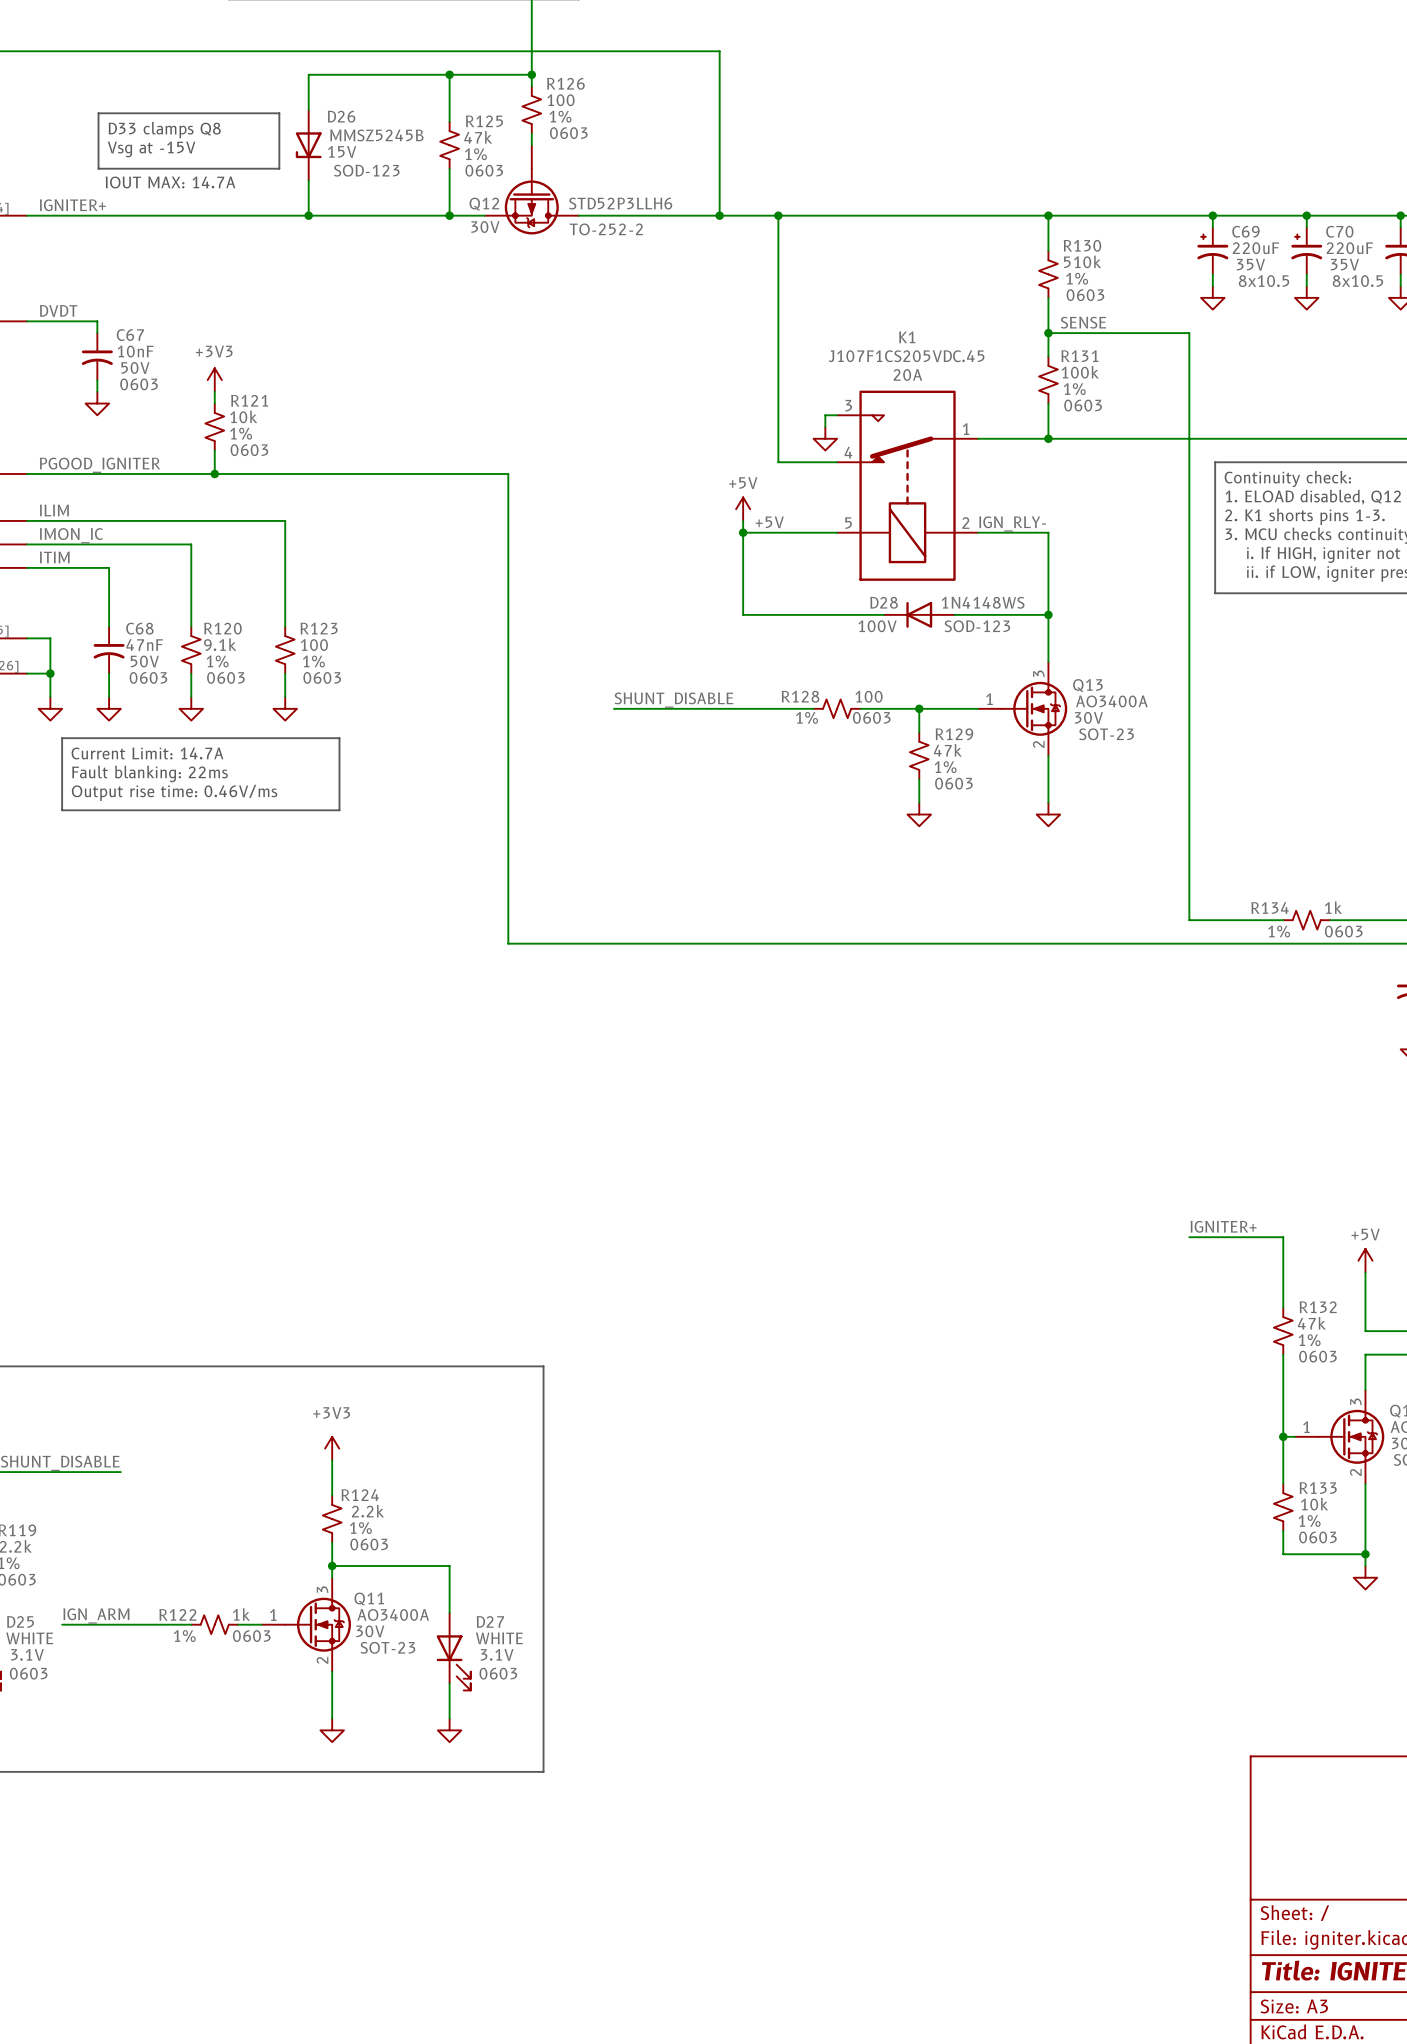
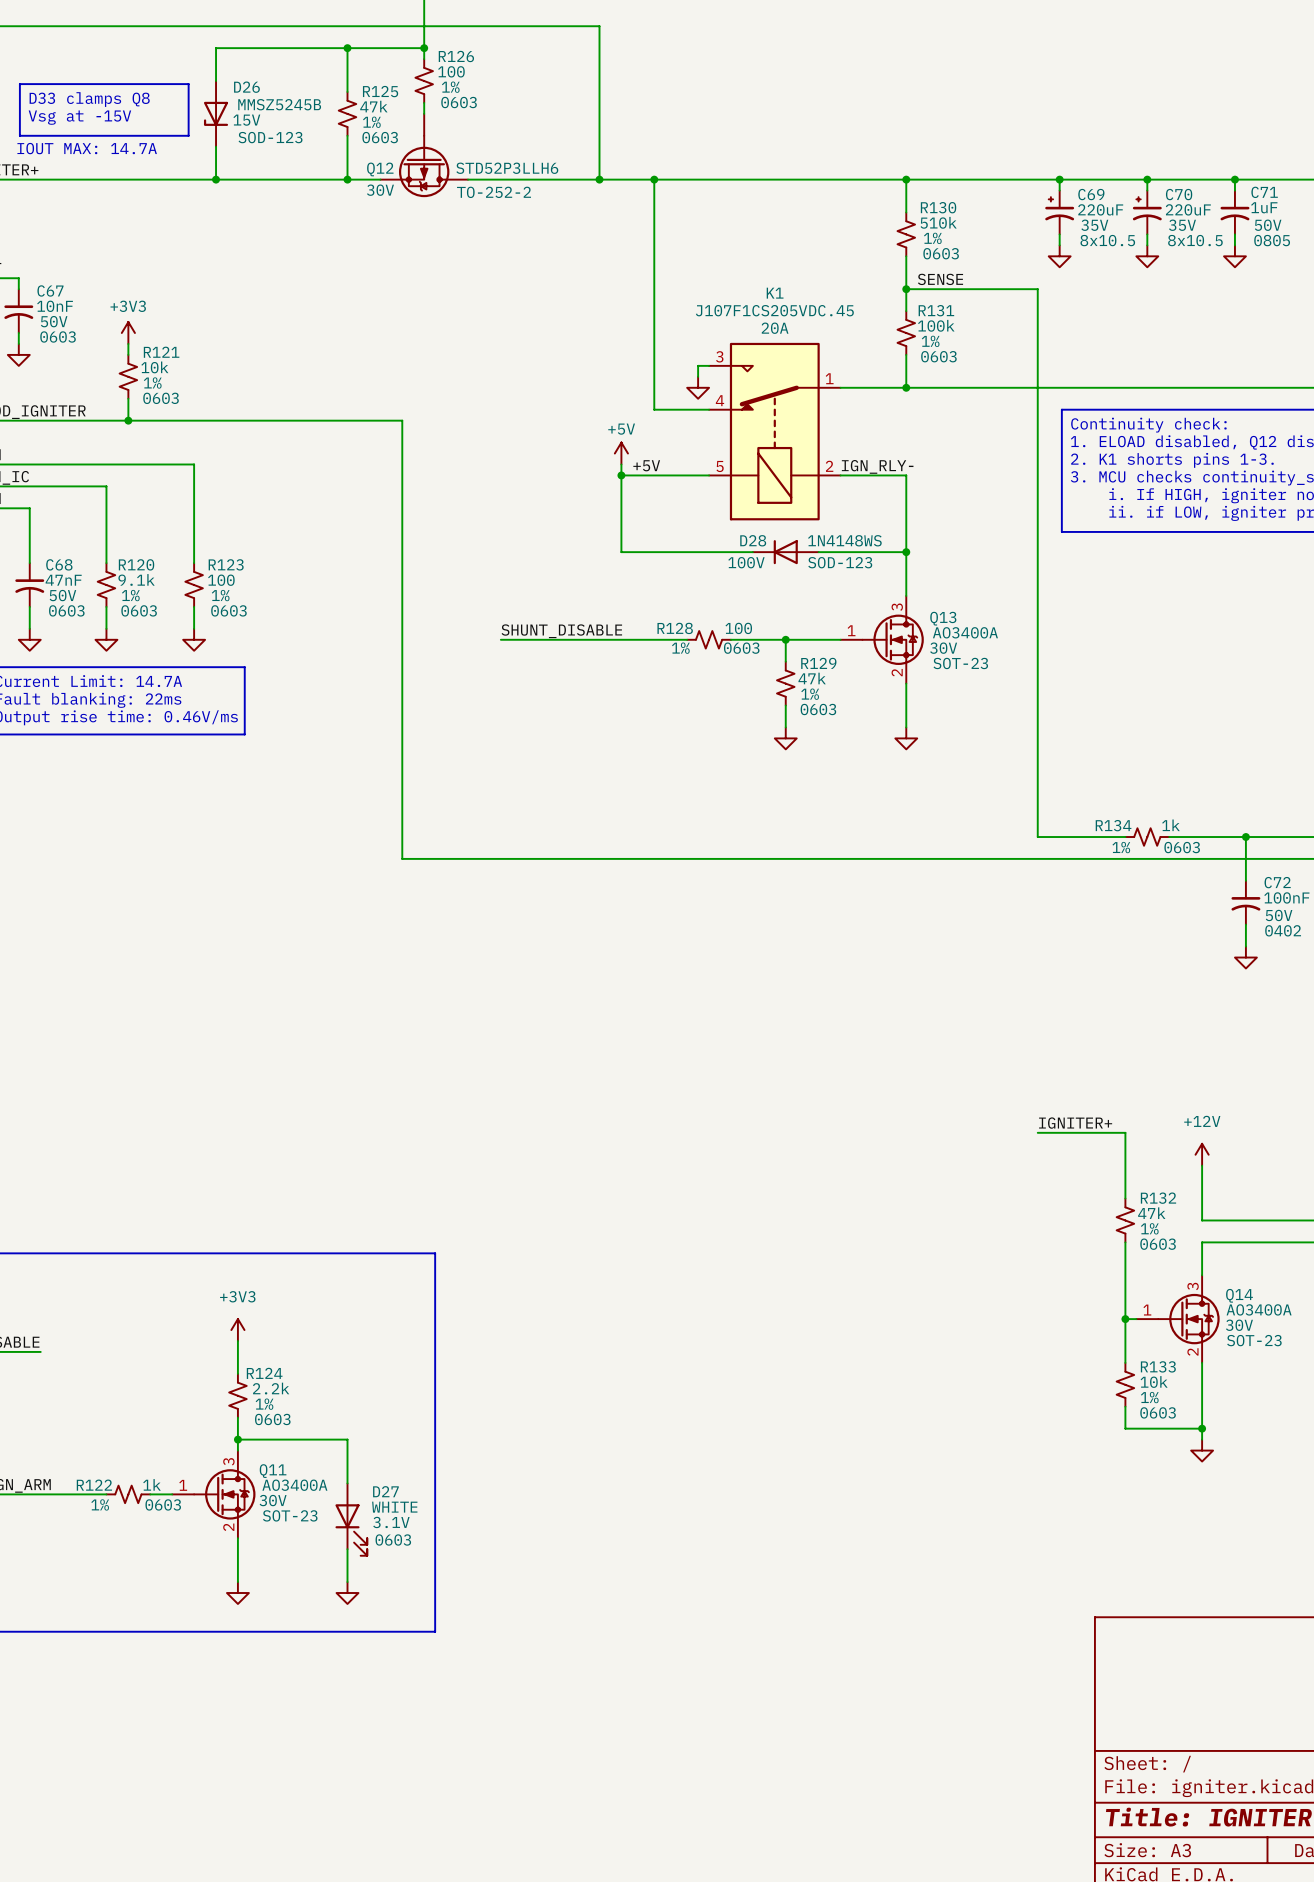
power symbol: +5V (1365, 1260) -> +12V (1202, 1154)

